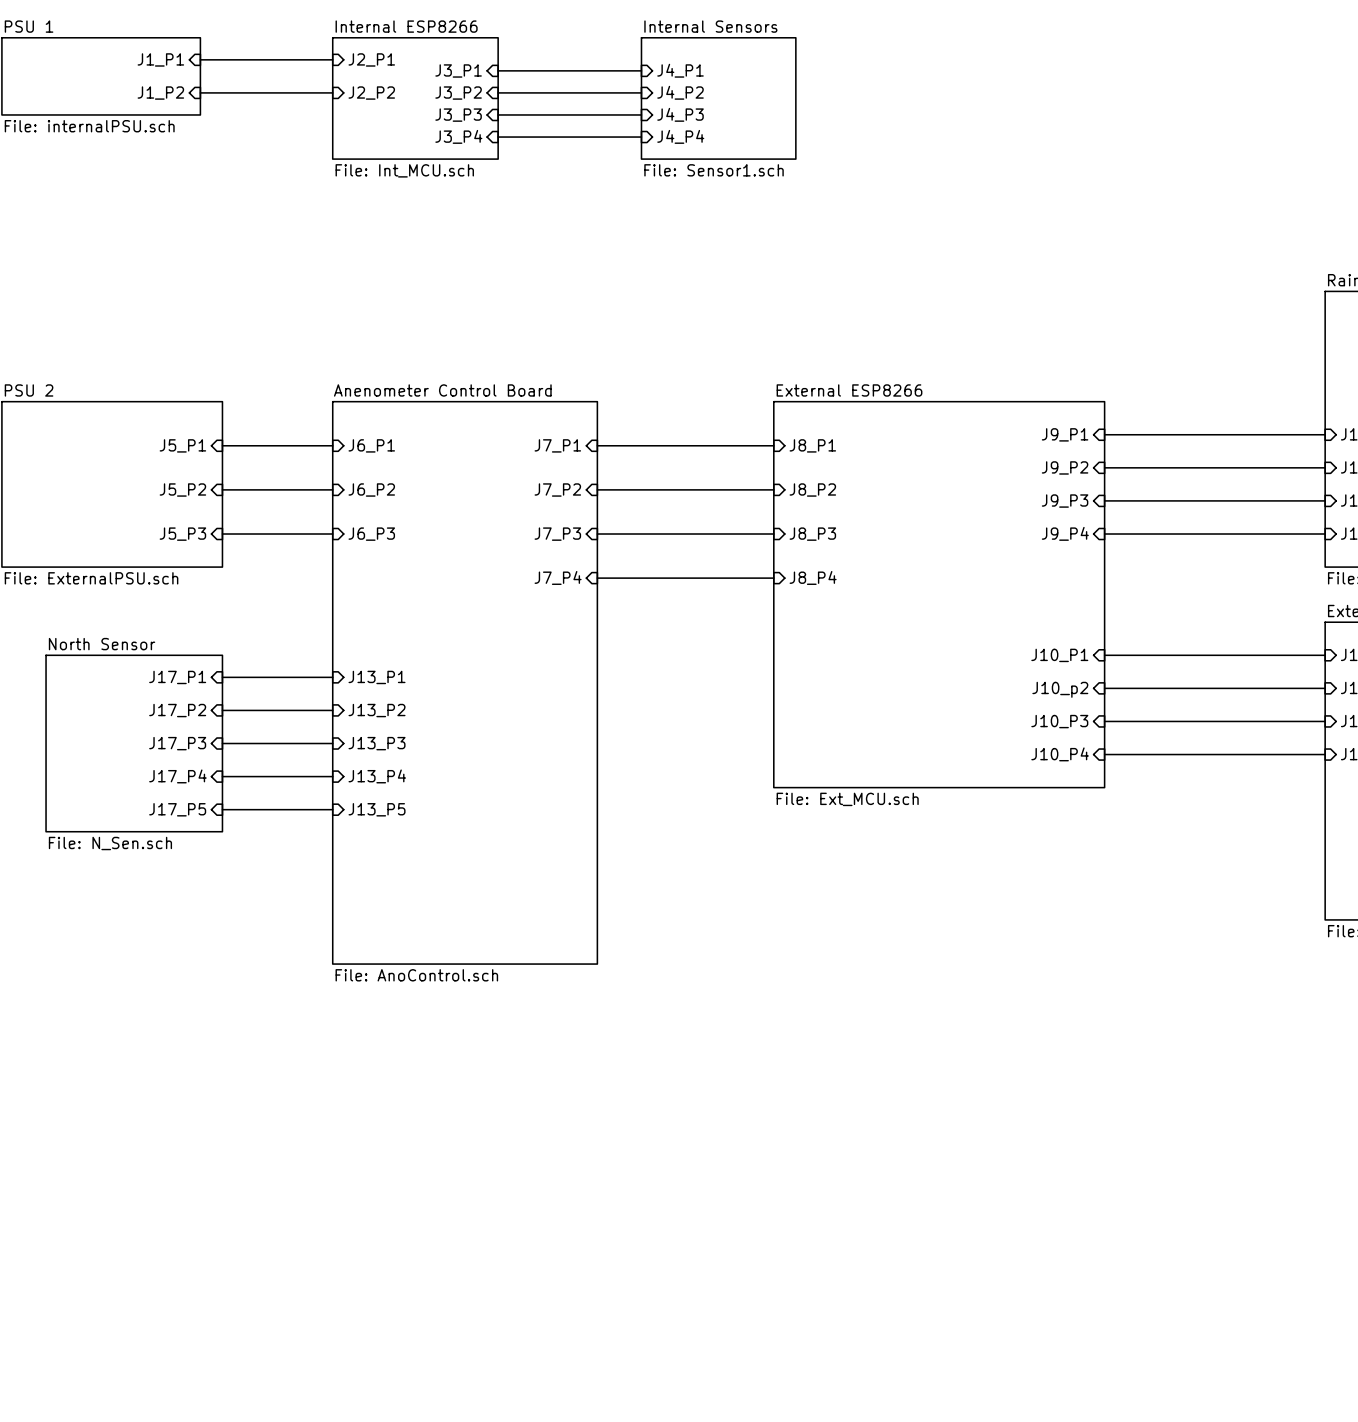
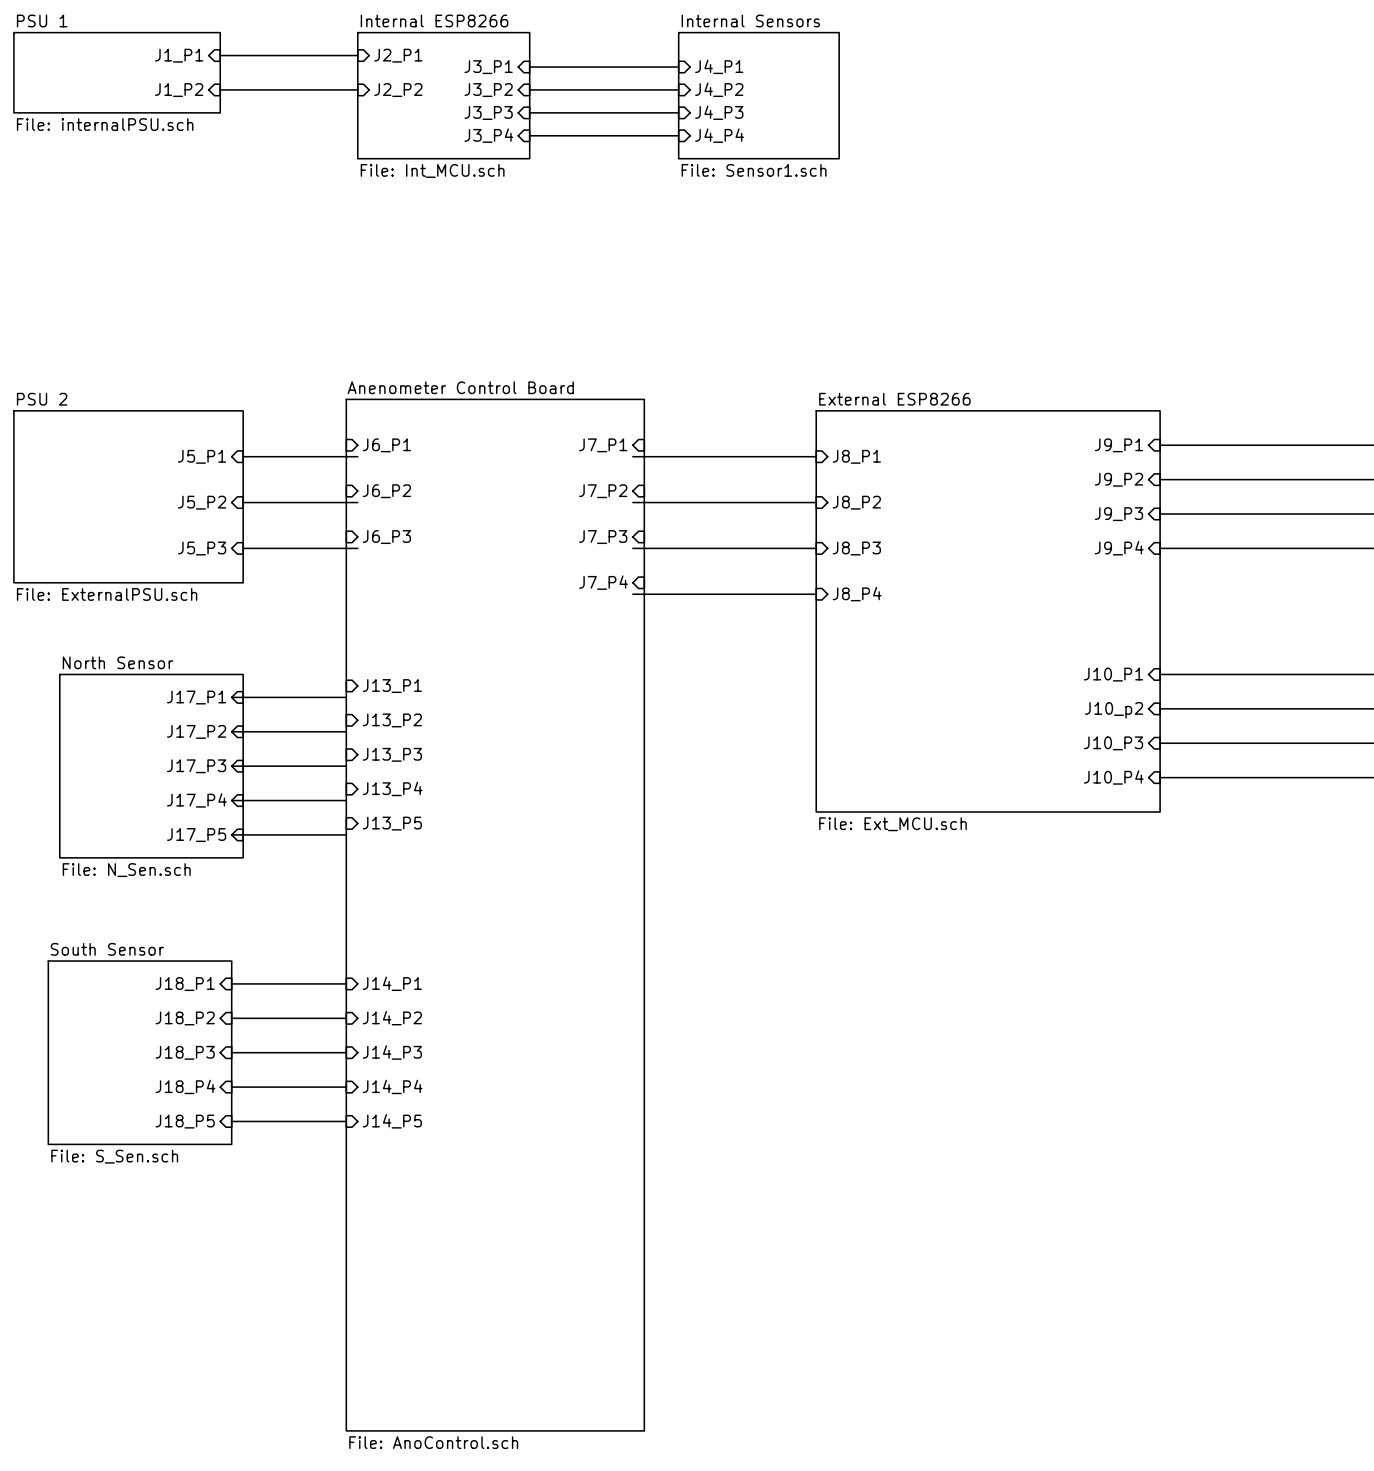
sheet pin position: J6_P1 (371, 445) -> J6_P1 (386, 445)
sheet pin position: J7_P1 (557, 445) -> J7_P1 (603, 445)
sheet pin position: J6_P2 (371, 490) -> J6_P2 (386, 491)
sheet pin position: J7_P2 (557, 490) -> J7_P2 (603, 491)
sheet pin position: J6_P3 (371, 534) -> J6_P3 (386, 537)
sheet pin position: J7_P3 (557, 534) -> J7_P3 (603, 537)
sheet pin position: J7_P4 (558, 577) -> J7_P4 (603, 582)
wire: (321, 677) (332, 677) -> (231, 697) (243, 697)
sheet pin position: J13_P1 (377, 677) -> J13_P1 (392, 686)
sheet Anenometer Control Board: File: AnoControl.sch (465, 682) -> none
wire: (321, 710) (332, 710) -> (231, 731) (243, 731)
sheet pin position: J13_P2 (377, 710) -> J13_P2 (392, 720)
wire: (321, 743) (332, 743) -> (231, 766) (243, 766)
sheet pin position: J13_P3 (377, 743) -> J13_P3 (392, 754)
wire: (321, 776) (332, 776) -> (231, 800) (243, 800)
sheet pin position: J13_P4 (377, 776) -> J13_P4 (392, 788)
wire: (321, 809) (332, 809) -> (231, 834) (243, 834)
sheet pin position: J13_P5 (377, 809) -> J13_P5 (392, 823)
sheet Anenometer Control Board: none -> File: AnoControl.sch (495, 915)
sheet pin: none -> J14_P1 (392, 983)
sheet pin: none -> J18_P1 (185, 984)
wire: none -> (231, 983) (346, 983)
sheet pin: none -> J14_P2 (392, 1018)
sheet pin: none -> J18_P2 (185, 1018)
wire: none -> (231, 1018) (346, 1018)
sheet South Sensor: none -> File: S_Sen.sch (140, 1052)
sheet pin: none -> J18_P3 (185, 1052)
wire: none -> (231, 1052) (346, 1052)
sheet pin: none -> J14_P3 (392, 1052)
sheet pin: none -> J18_P4 (185, 1086)
wire: none -> (231, 1087) (346, 1087)
sheet pin: none -> J14_P4 (392, 1086)
sheet pin: none -> J18_P5 (185, 1121)
wire: none -> (231, 1121) (346, 1121)
sheet pin: none -> J14_P5 (392, 1121)

